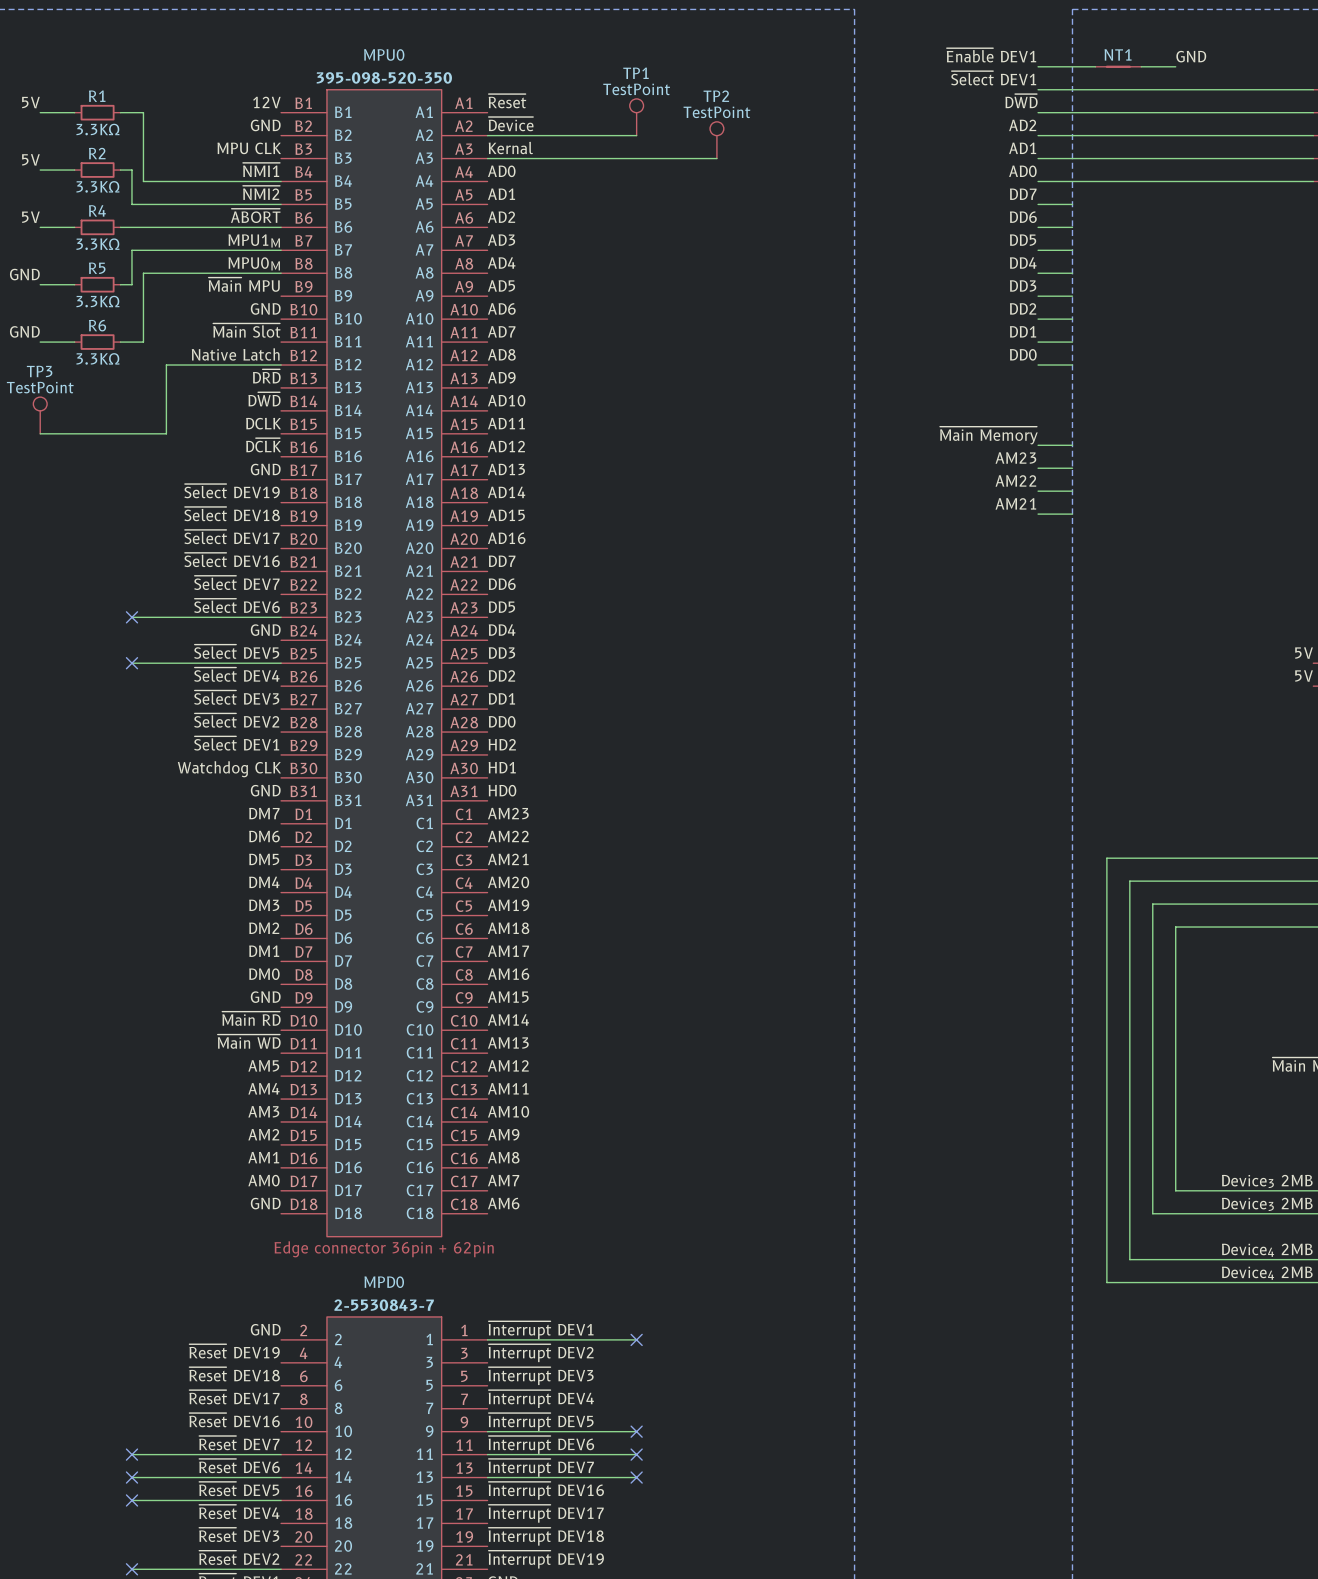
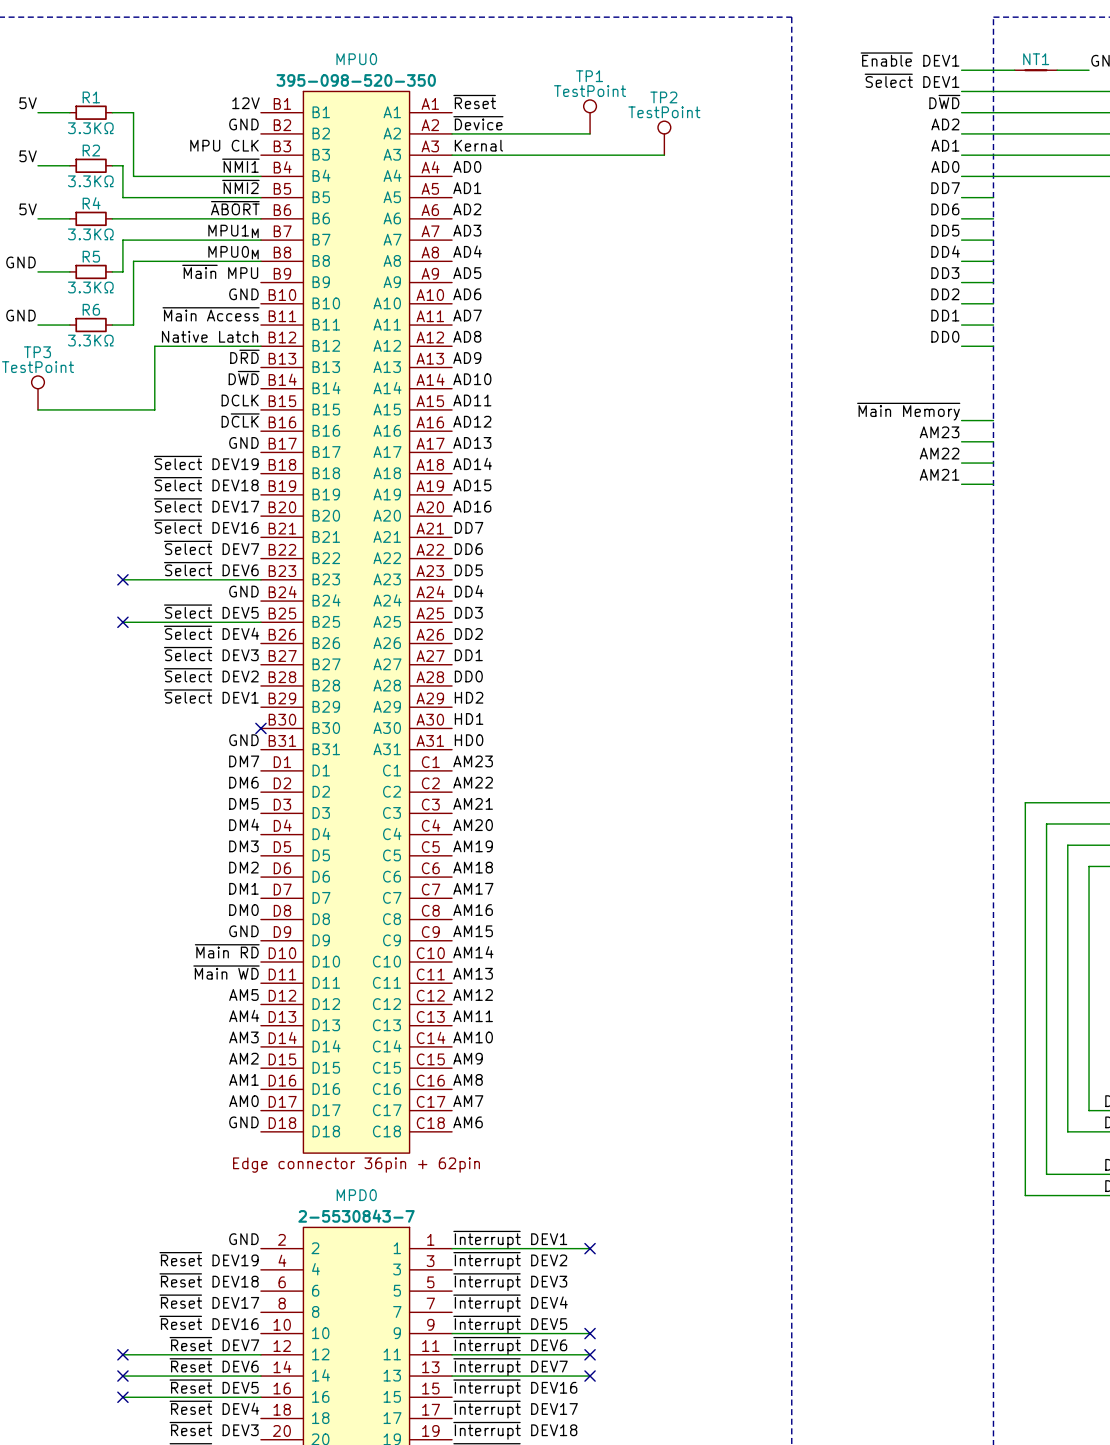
label: ~{Main Slot} (246, 330) -> ~{Main Access} (211, 314)
label: Watchdog CLK (229, 769) -> none
no-connect mark: none -> (260, 728)

